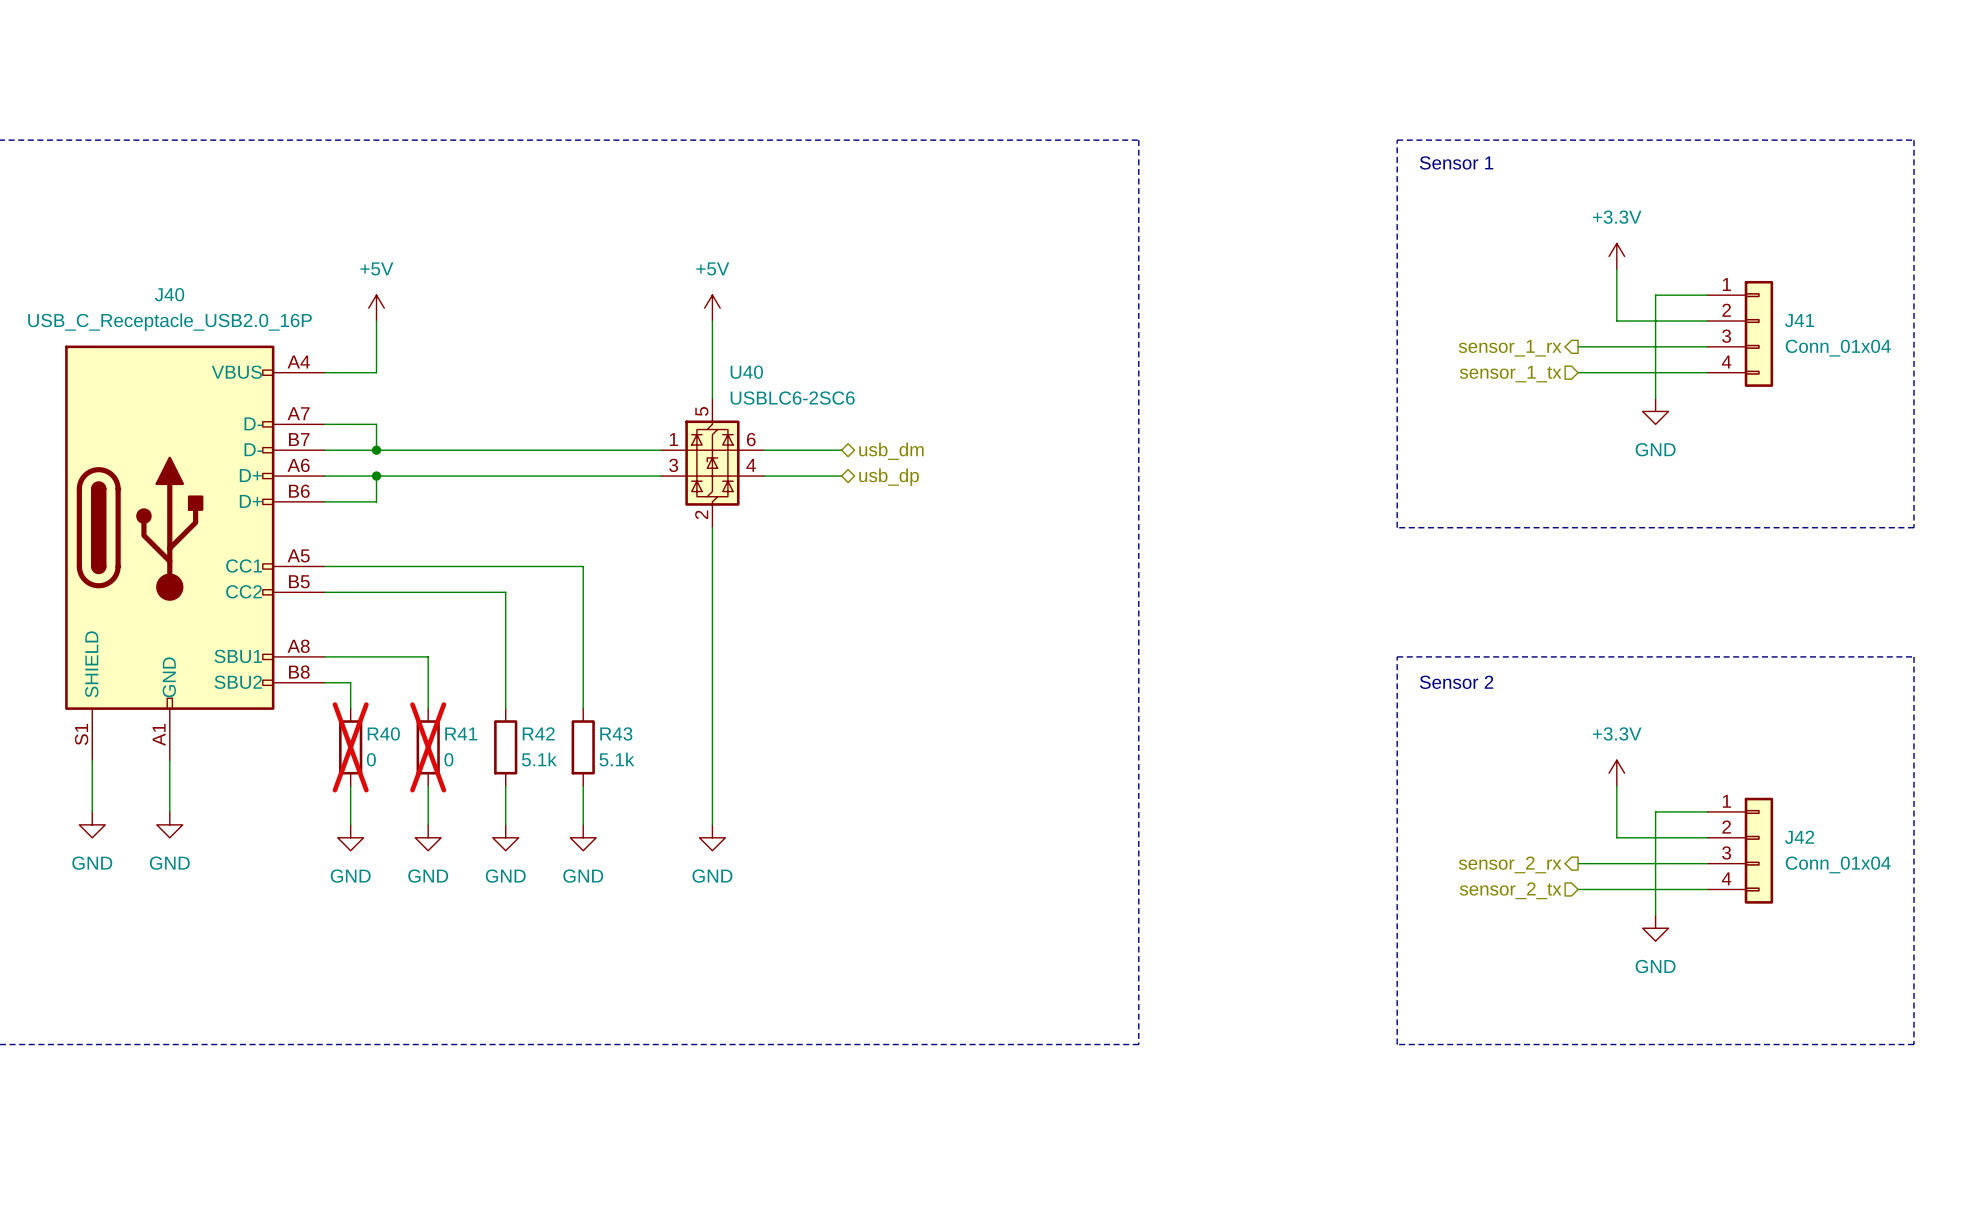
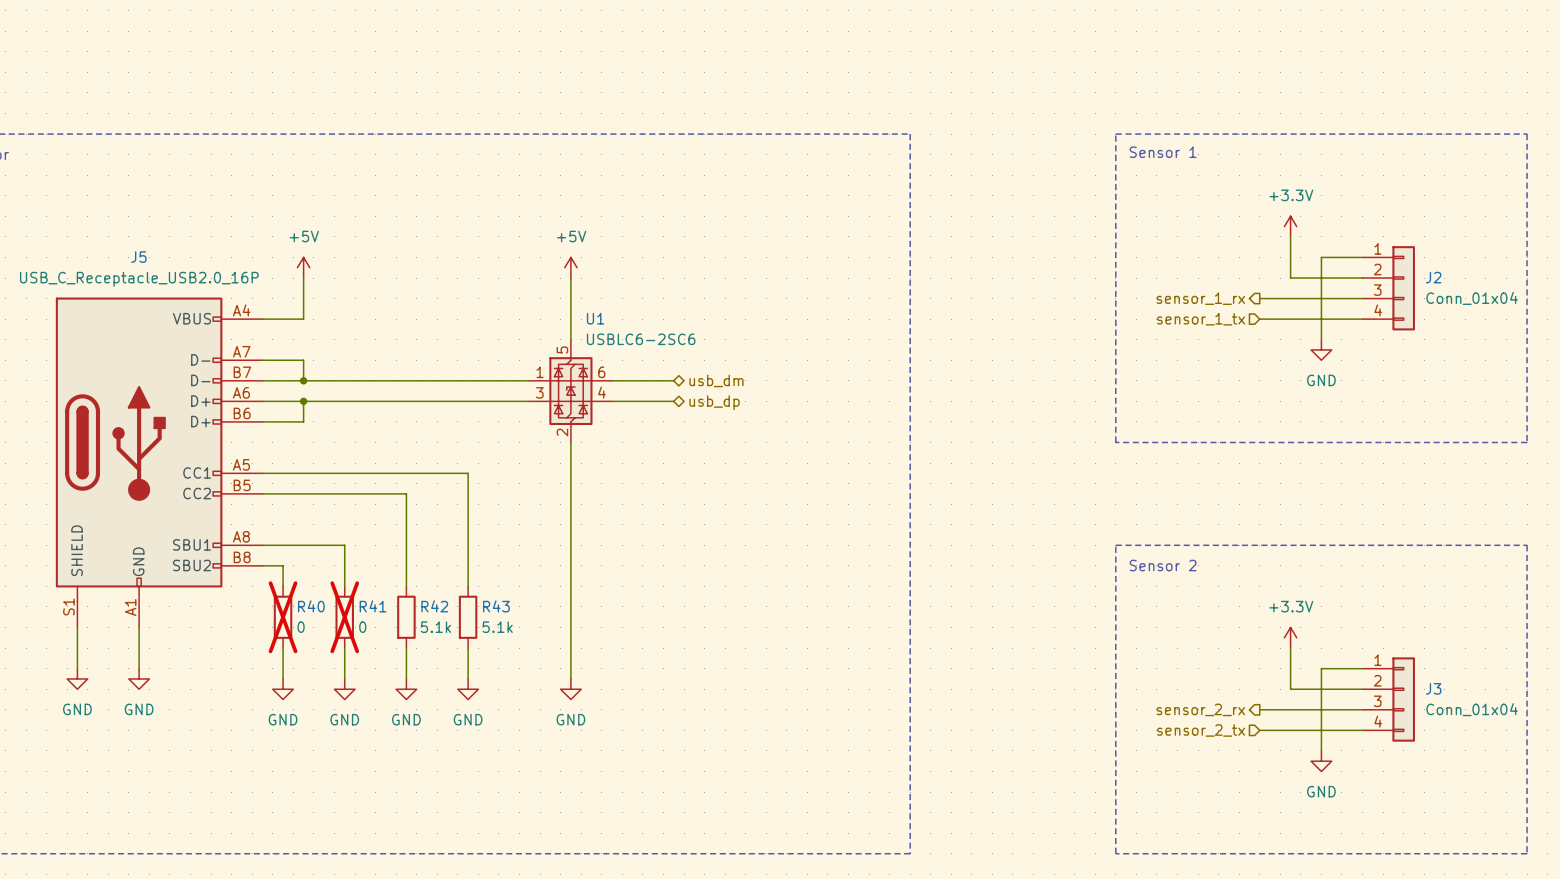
J40 name: J40 (169, 294) -> J5 (138, 257)
J41 name: J41 (1799, 320) -> J2 (1433, 277)
U40 name: U40 (746, 372) -> U1 (595, 318)
J42 name: J42 (1799, 837) -> J3 (1433, 688)

